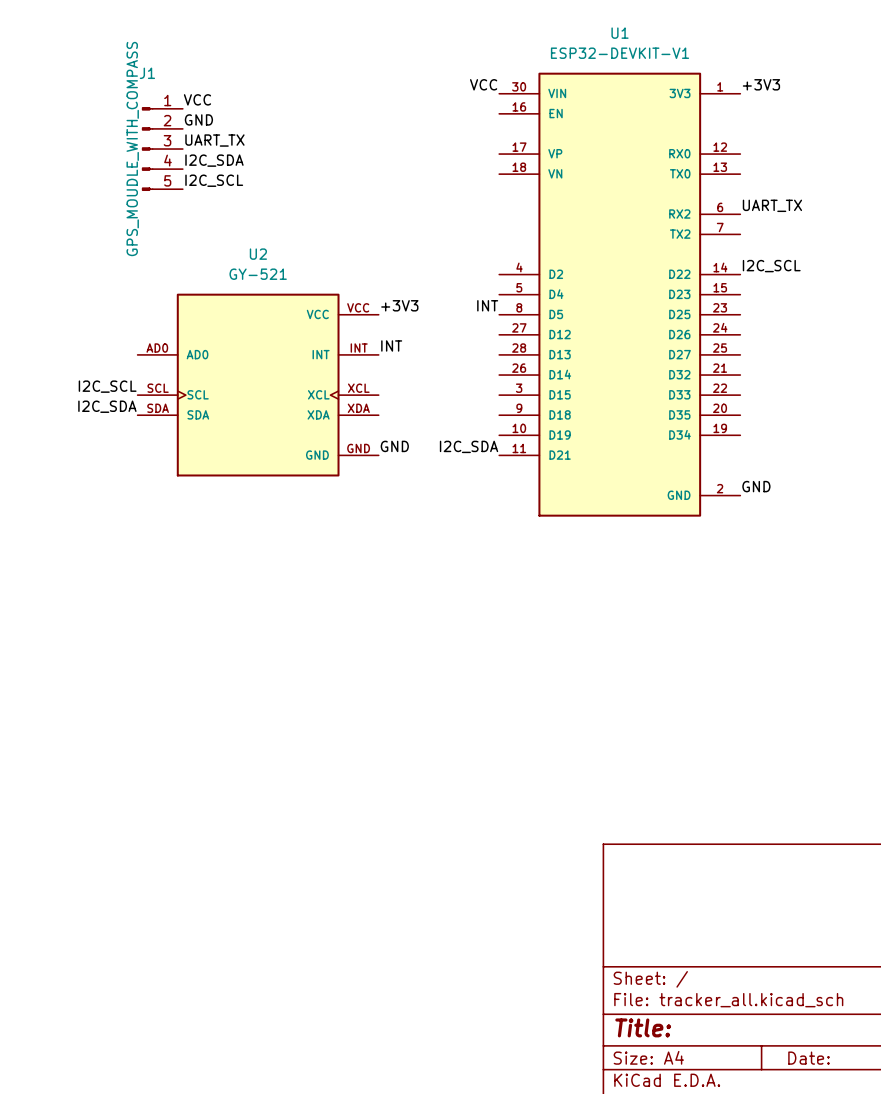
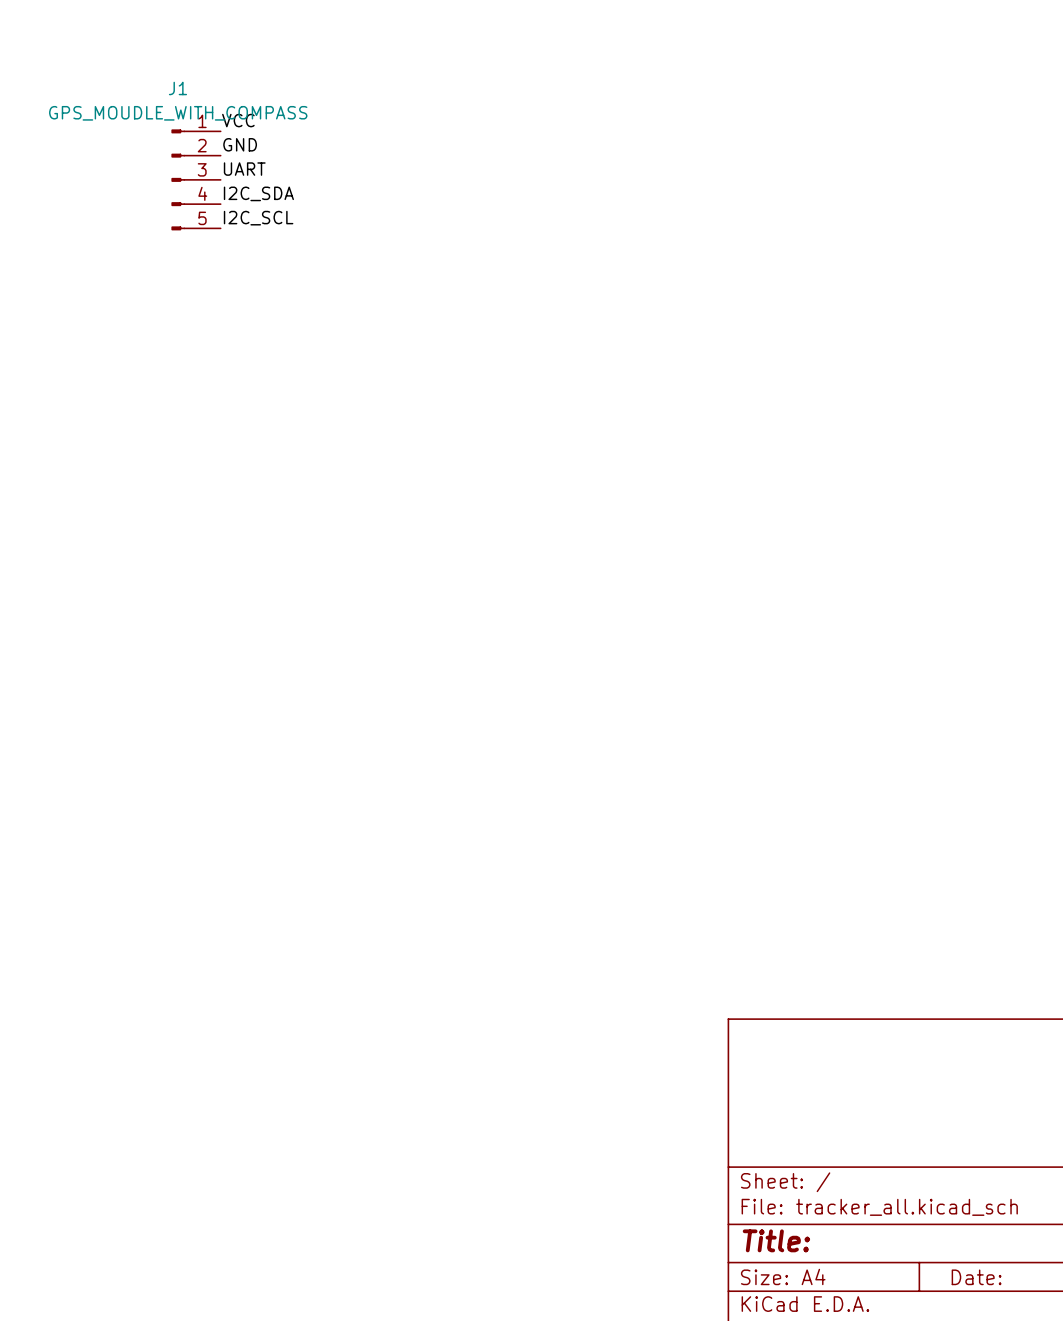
label: VCC (483, 84) -> none
label: +3V3 (761, 84) -> none
label: UART_TX (214, 140) -> UART (244, 169)
J1 value rotation: 0° (132, 149) -> 90° clockwise (178, 113)
label: UART_TX (772, 205) -> none
label: I2C_SCL (771, 266) -> none
U1: ESP32-DEVKIT-V1 (619, 294) -> none
label: +3V3 (399, 305) -> none
label: INT (487, 305) -> none
label: INT (391, 345) -> none
U2: GY-521 (258, 385) -> none
label: I2C_SCL (107, 386) -> none
label: I2C_SDA (107, 406) -> none
label: GND (394, 446) -> none
label: I2C_SDA (469, 446) -> none
label: GND (756, 486) -> none

